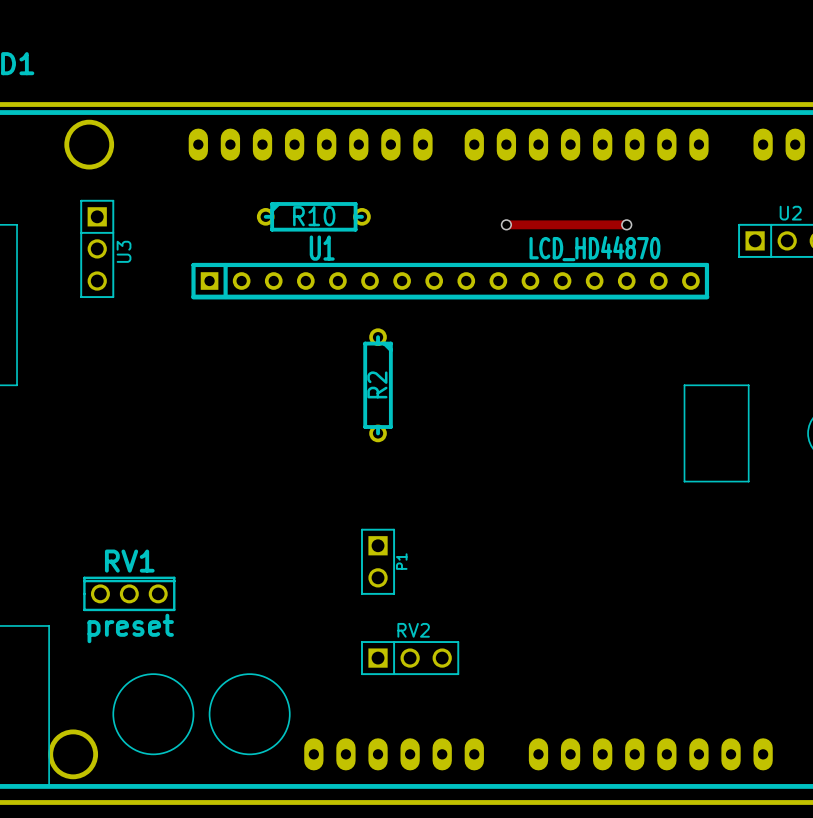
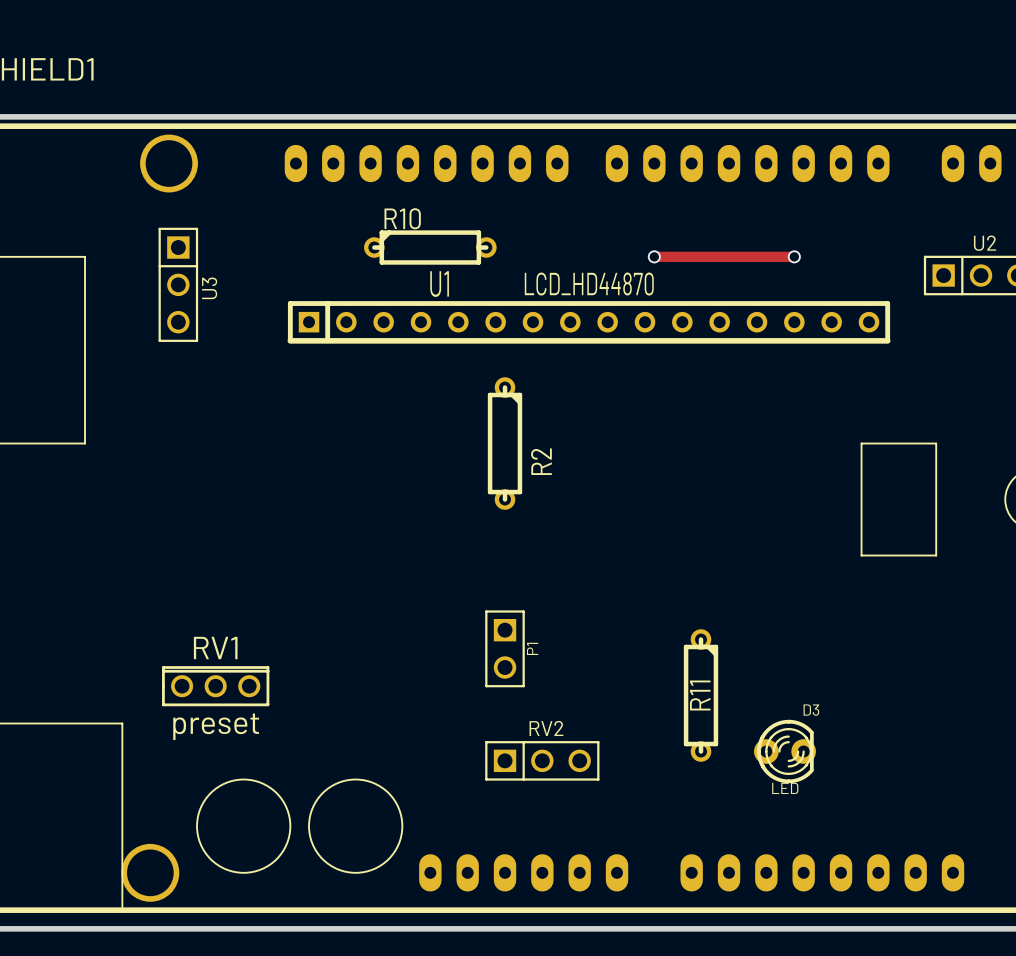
R10 name position: R10 (314, 216) -> R10 (402, 218)
U1 value position: LCD_HD44870 (594, 248) -> LCD_HD44870 (589, 284)
R2 name position: R2 (377, 384) -> R2 (541, 461)
R11: none -> (701, 695)
D3: none -> LED (785, 751)

